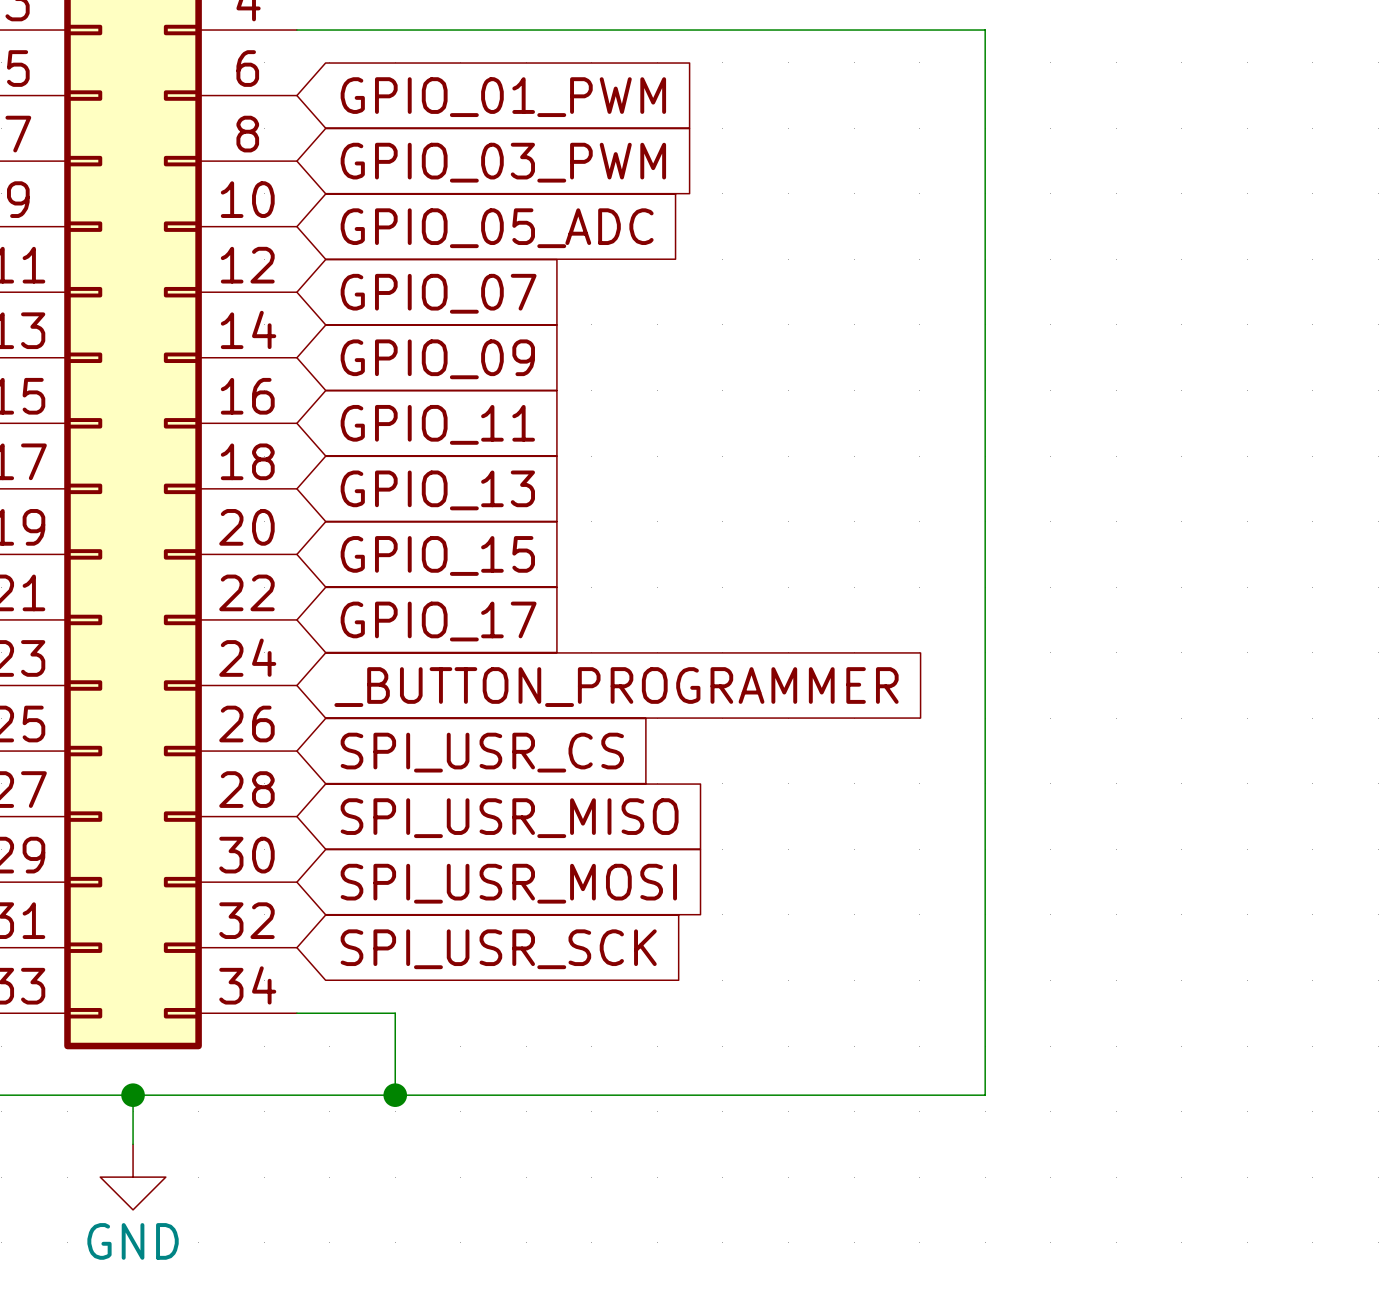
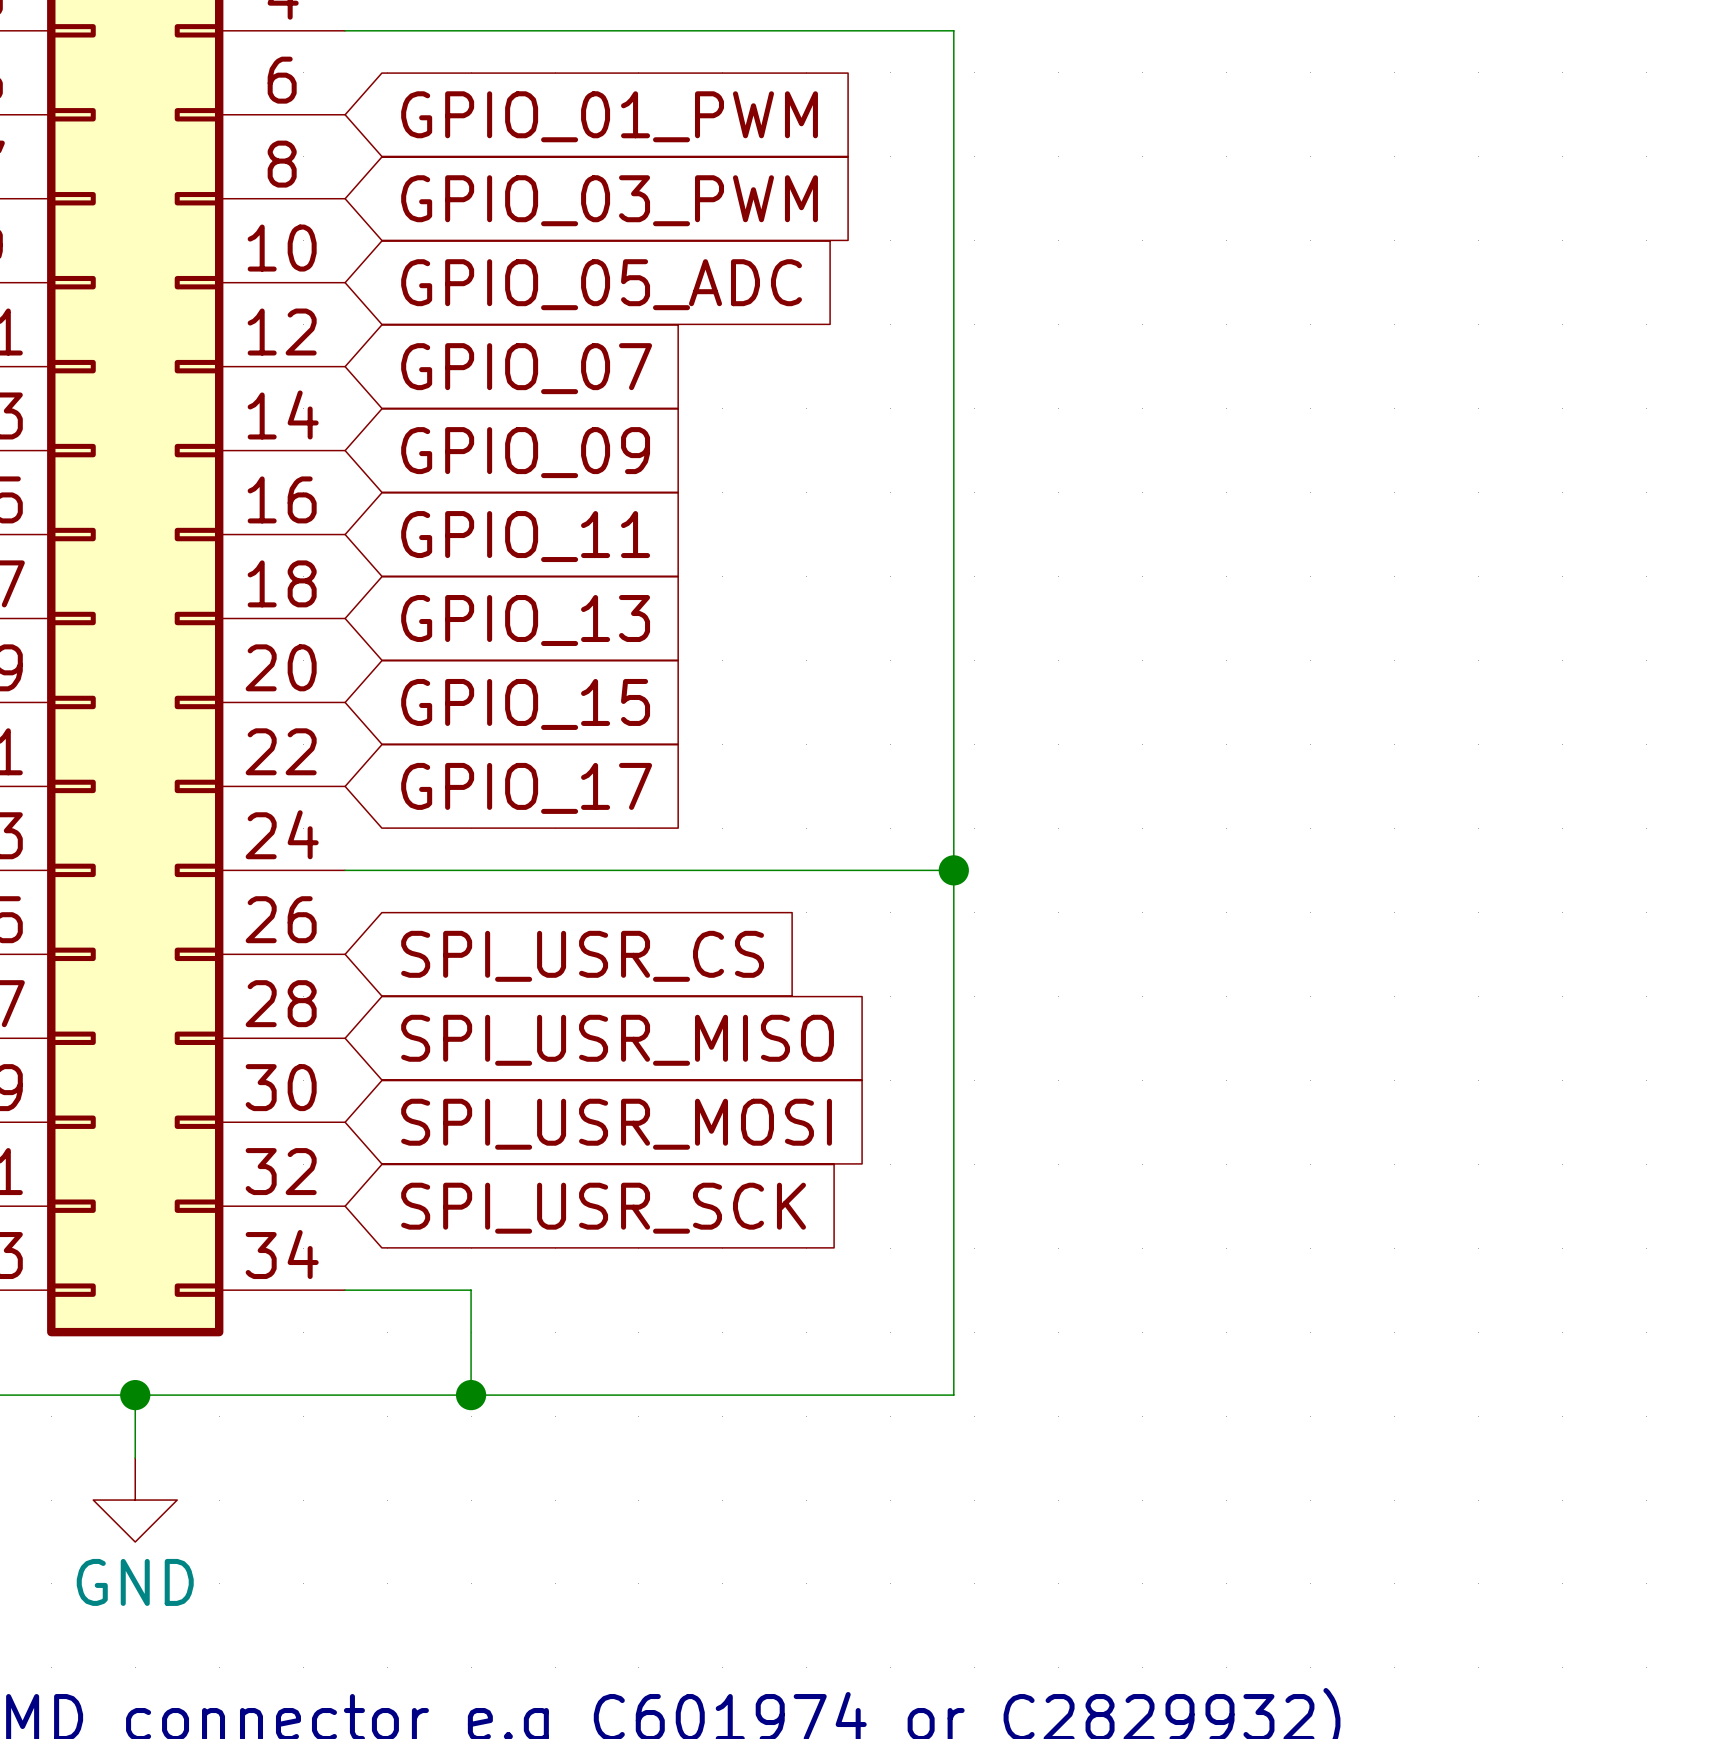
wire: (772, 30) (985, 30) (985, 1095) (772, 1095) -> (953, 30) (953, 1395)
wire: none -> (345, 870) (953, 870)
junction: none -> (953, 870)
global label: _BUTTON_PROGRAMMER (616, 687) -> none

